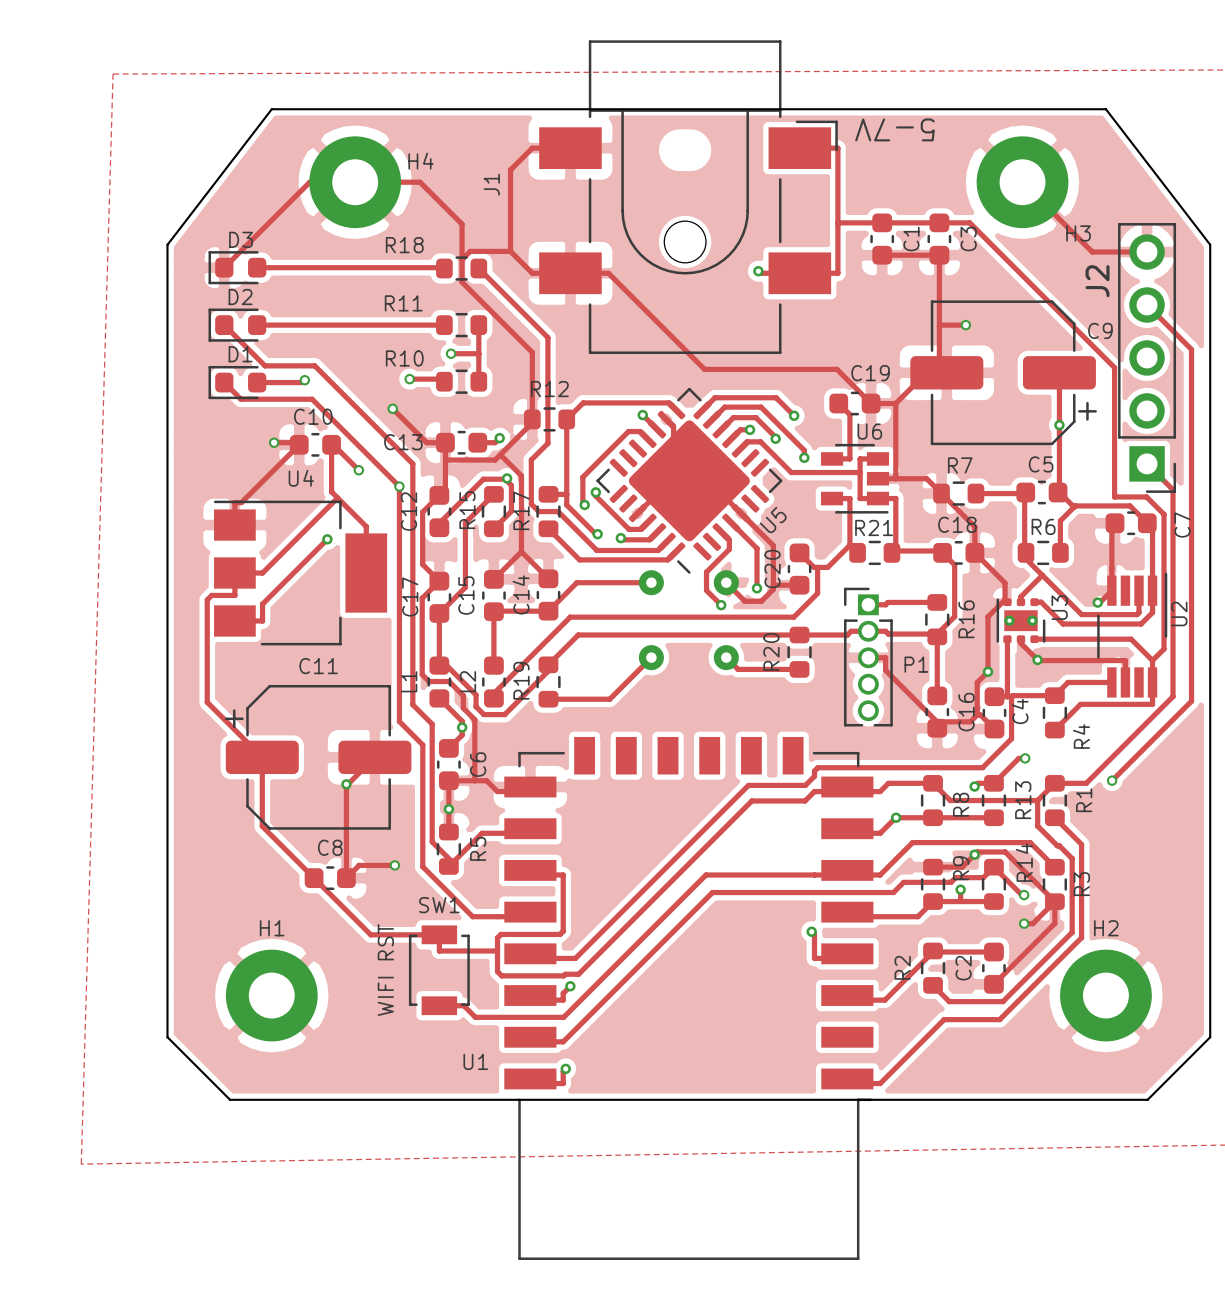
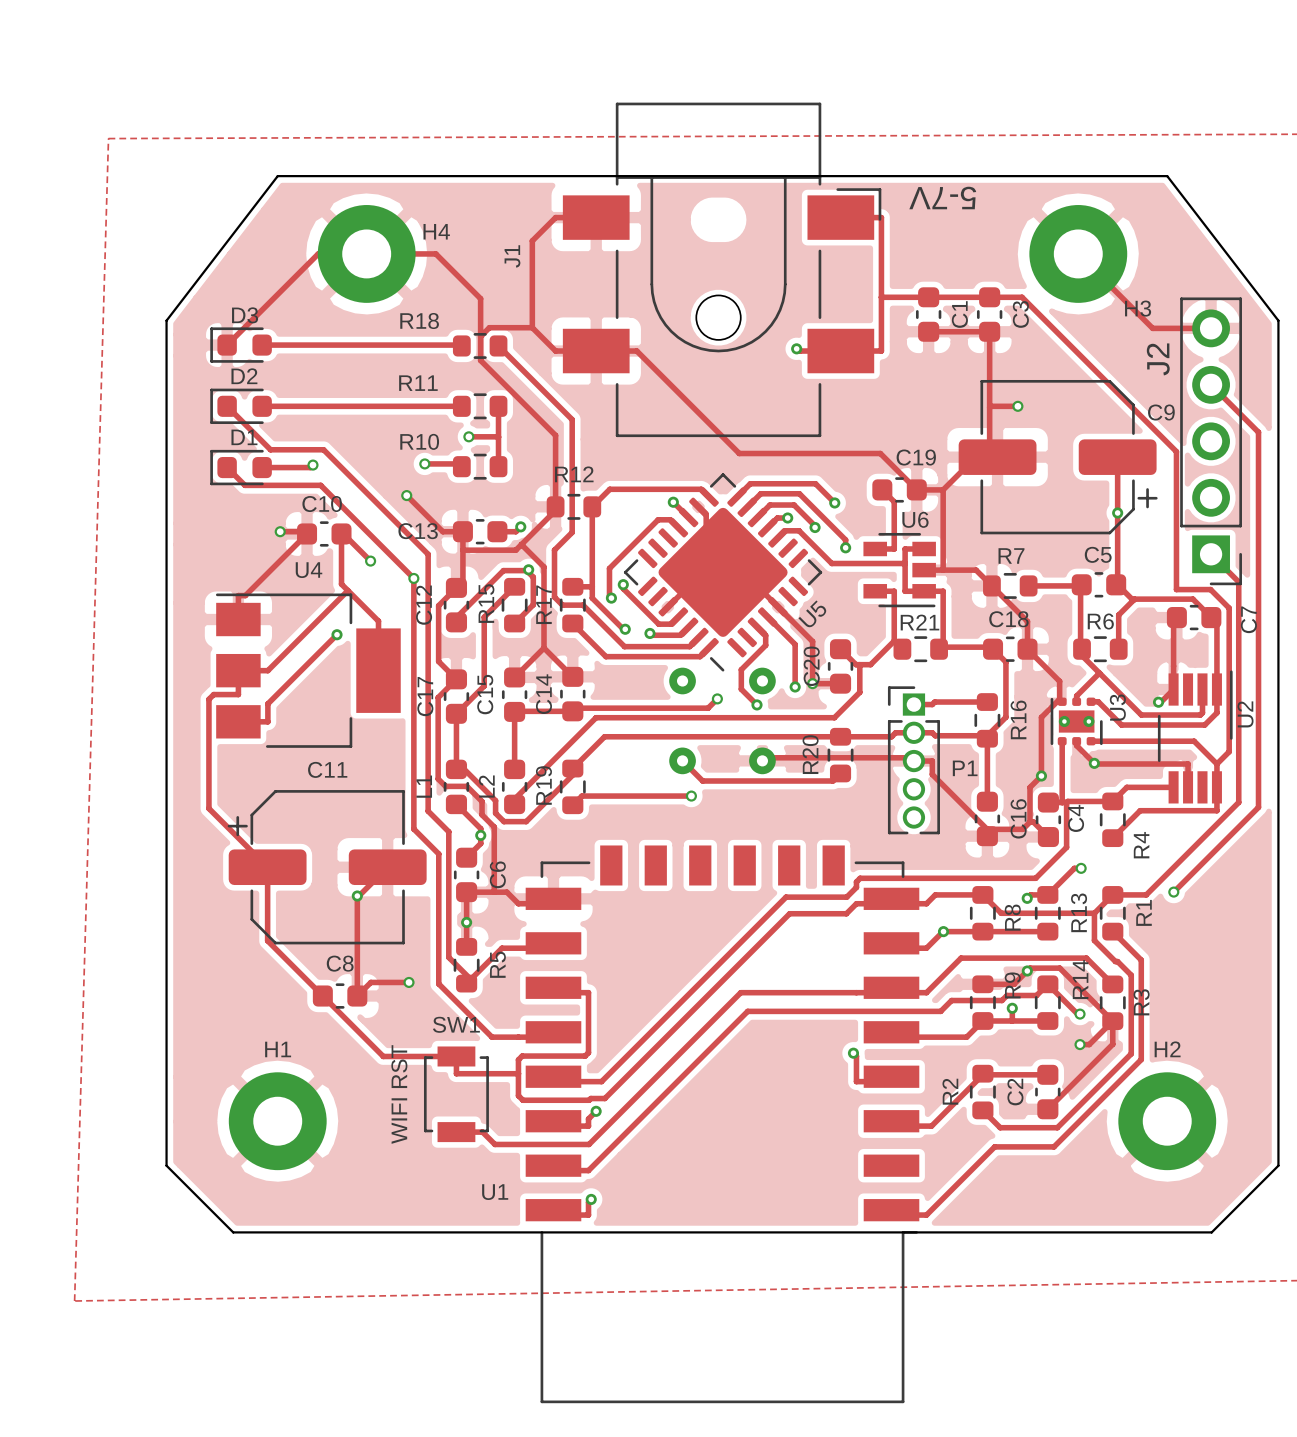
track: (651, 582) (576, 582) (551, 608) -> (717, 698) (708, 708) (575, 708)
track: (726, 582) (744, 601) (761, 601) (773, 589) (773, 585) -> none
via: none -> (812, 683)
via: none -> (717, 698)
track: (651, 657) (609, 699) (548, 699) -> (691, 796) (581, 796) (572, 805)
track: none -> (682, 760) (702, 781) (832, 781) (840, 773)
track: (726, 657) (738, 669) (799, 669) -> (762, 760) (765, 757) (910, 757) (913, 761)
via: none -> (691, 796)

